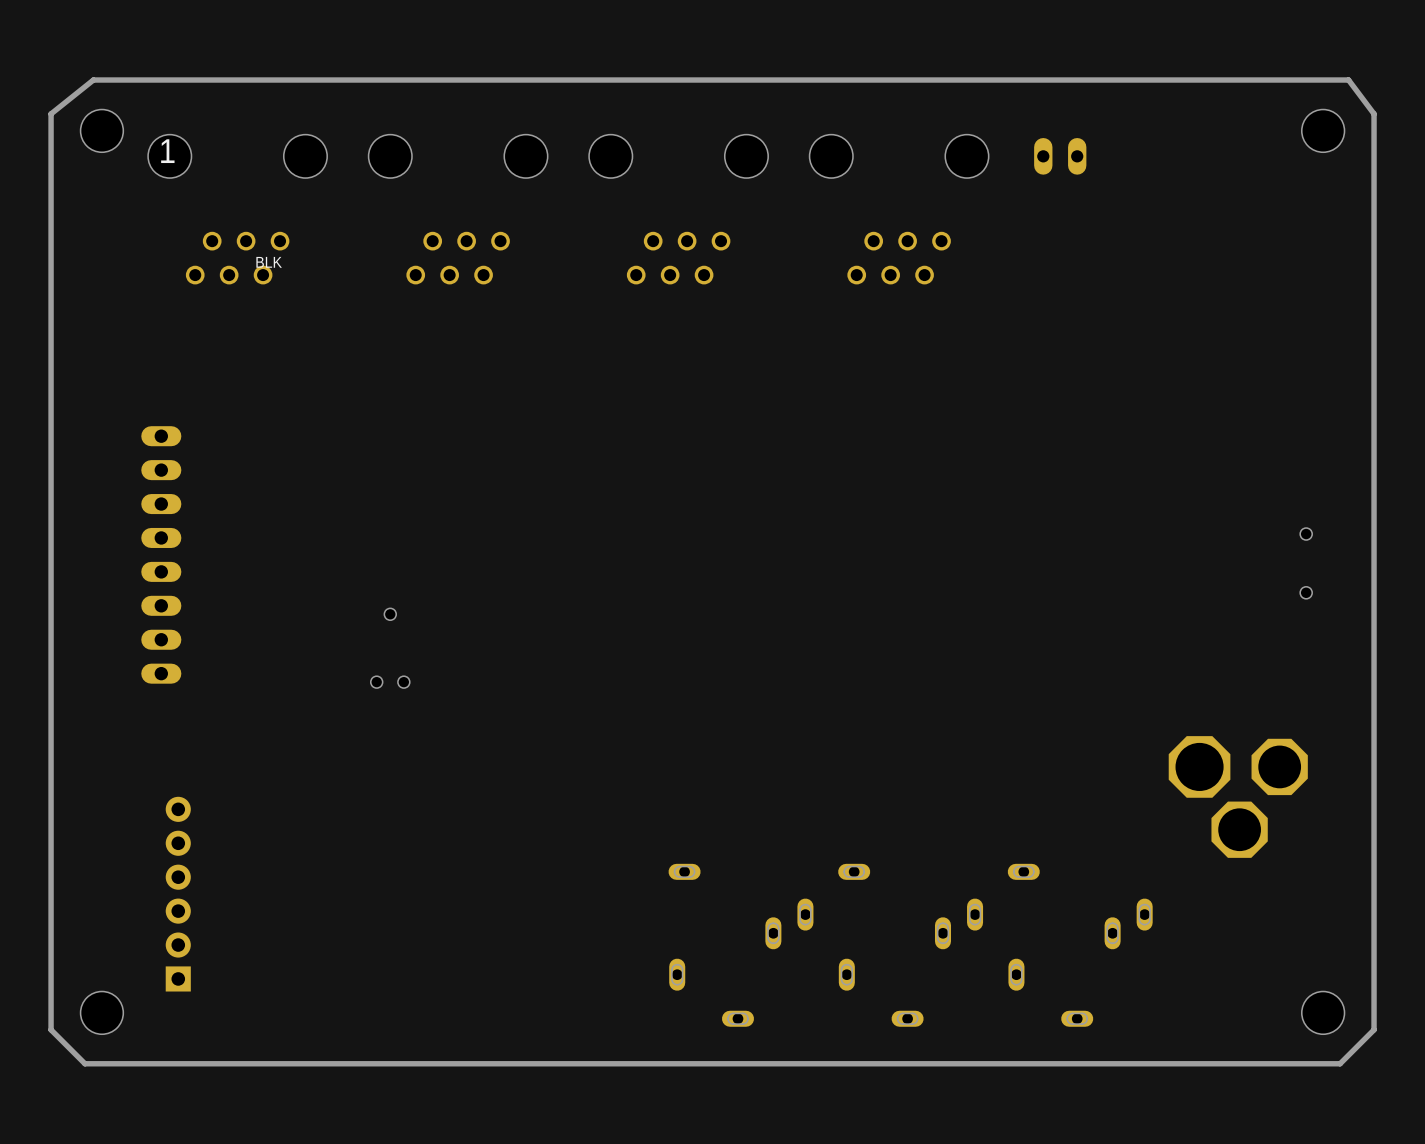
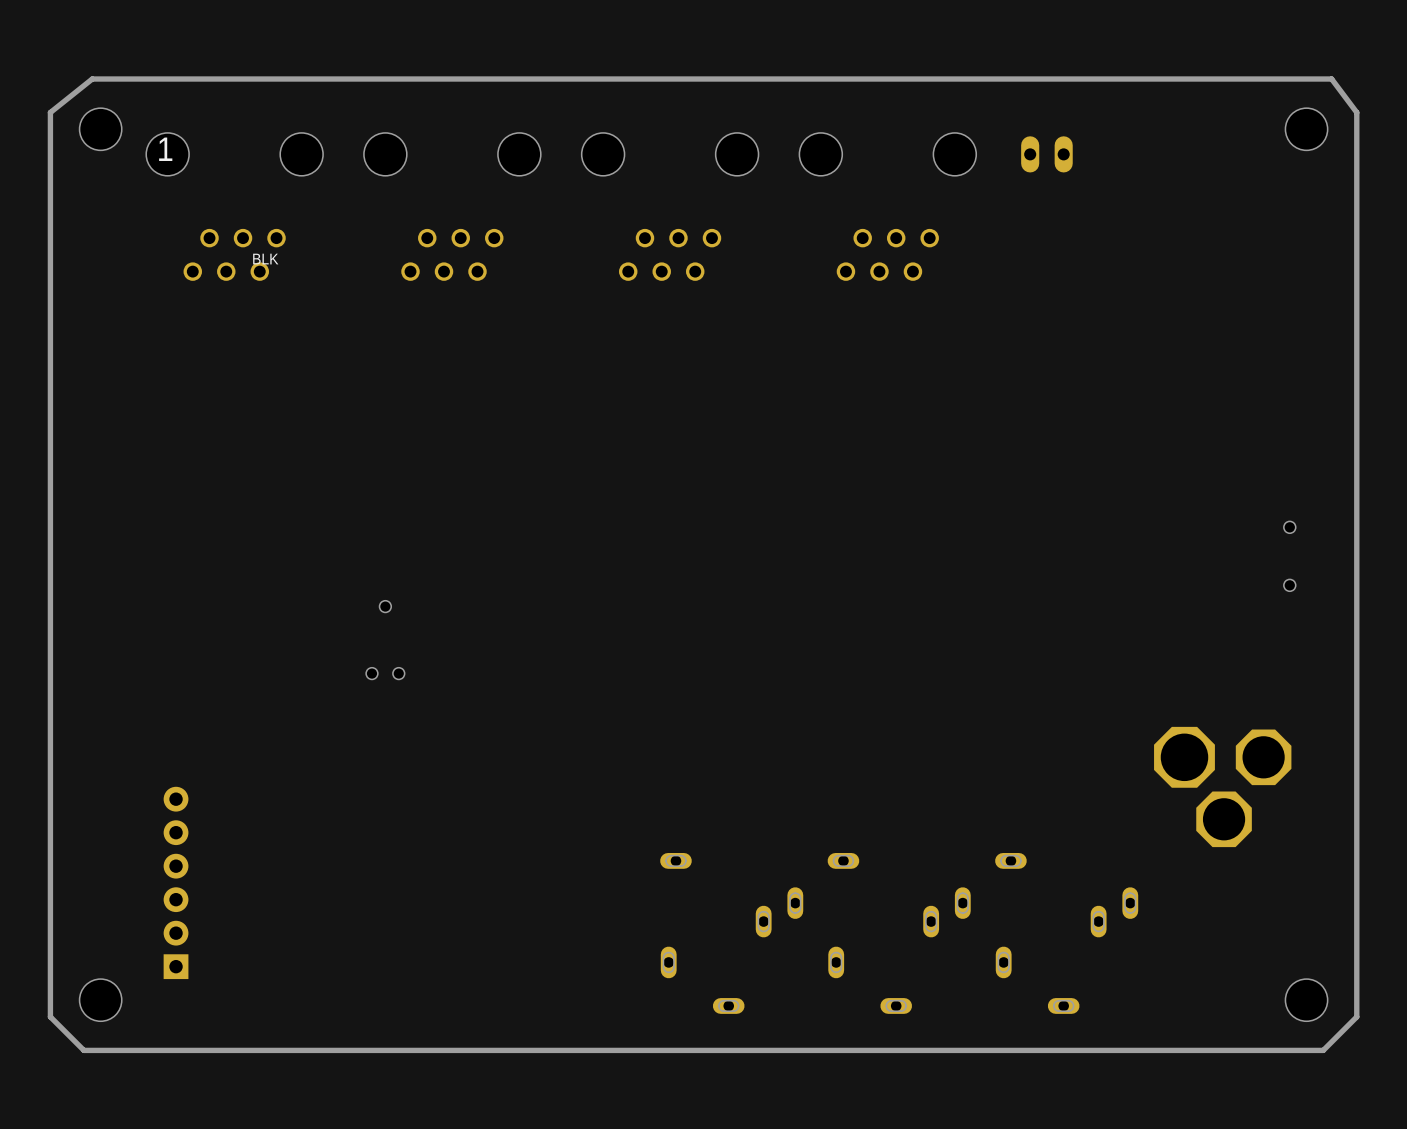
part: (161, 554) -> none

